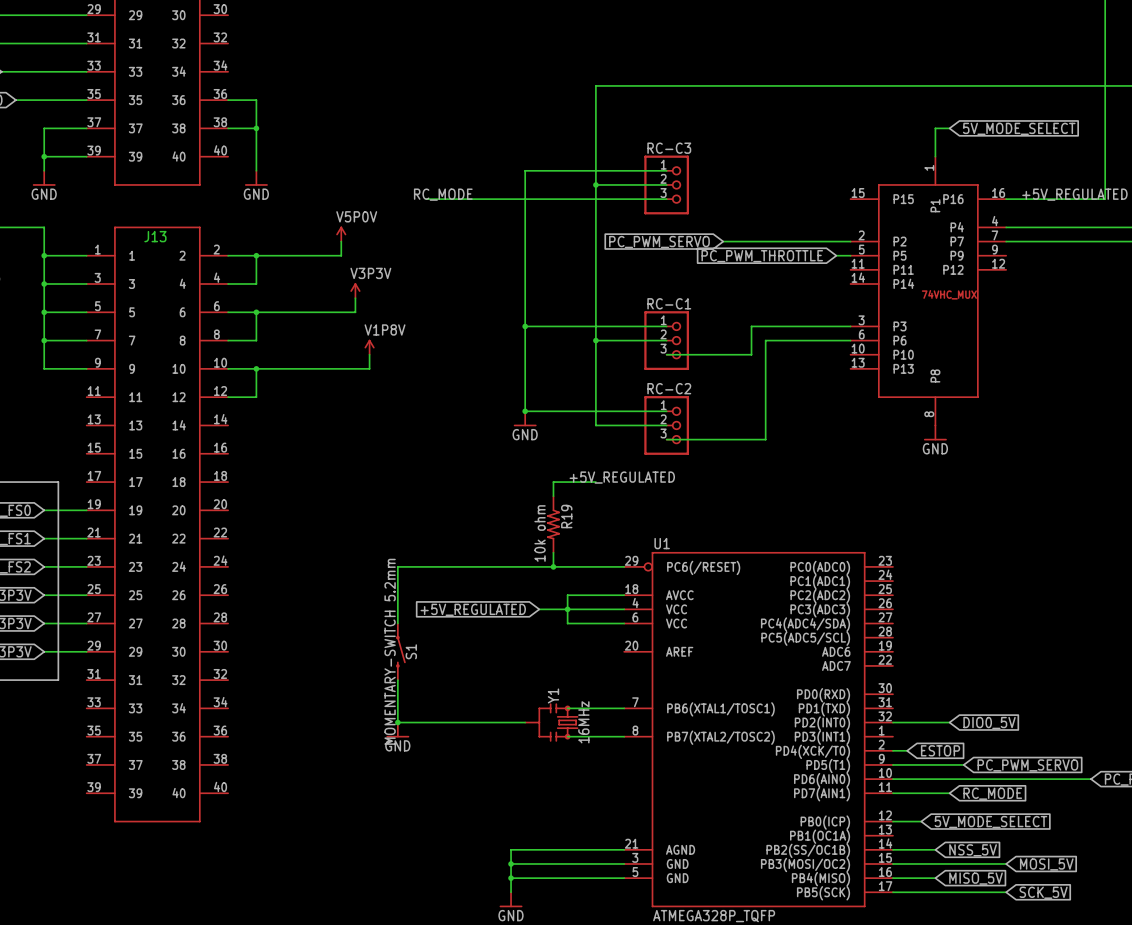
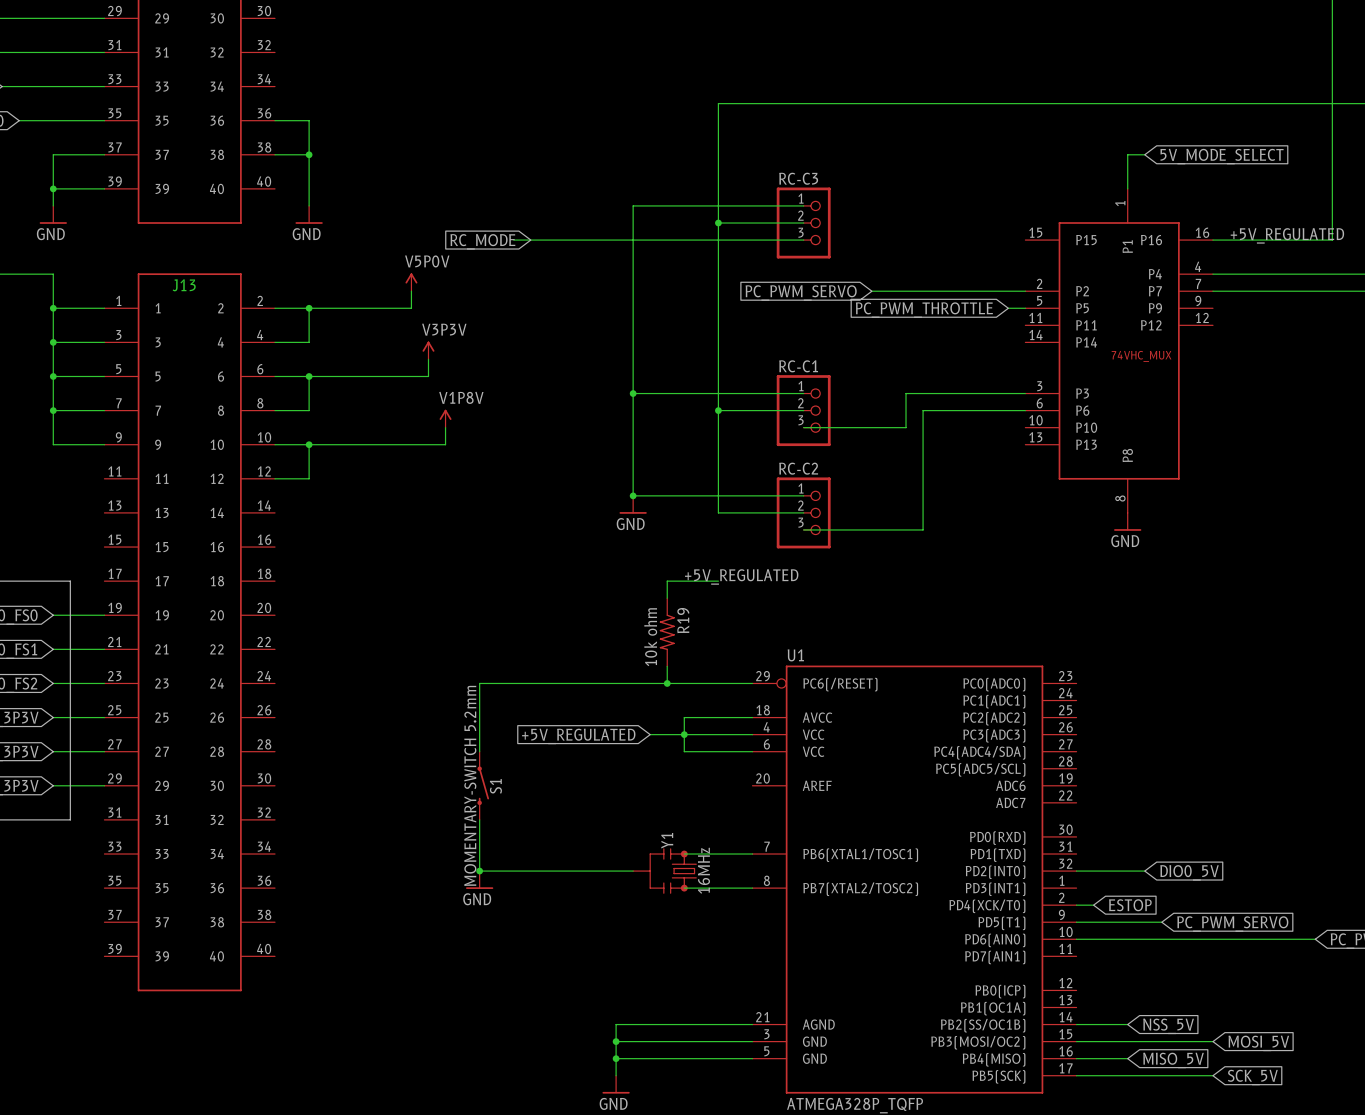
label: RC_MODE (443, 194) -> none
global label: none -> RC_MODE (482, 241)
wire: (892, 793) (949, 793) -> none
global label: RC_MODE (992, 793) -> none
wire: (892, 821) (921, 821) -> none
global label: 5V_MODE_SELECT (990, 822) -> none

